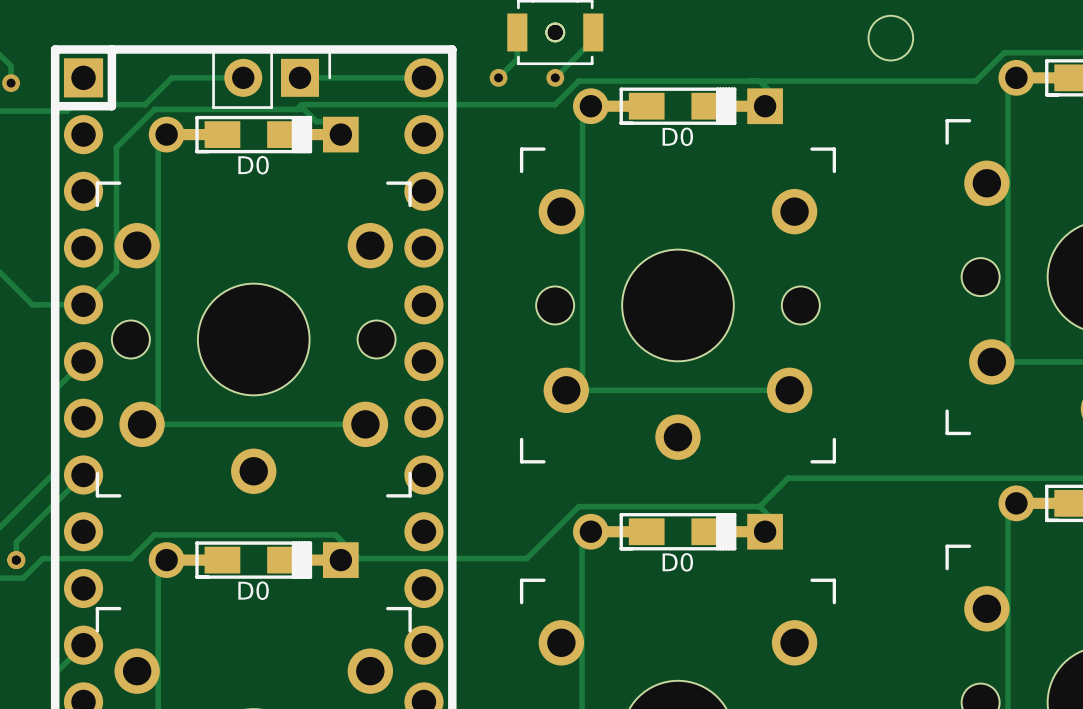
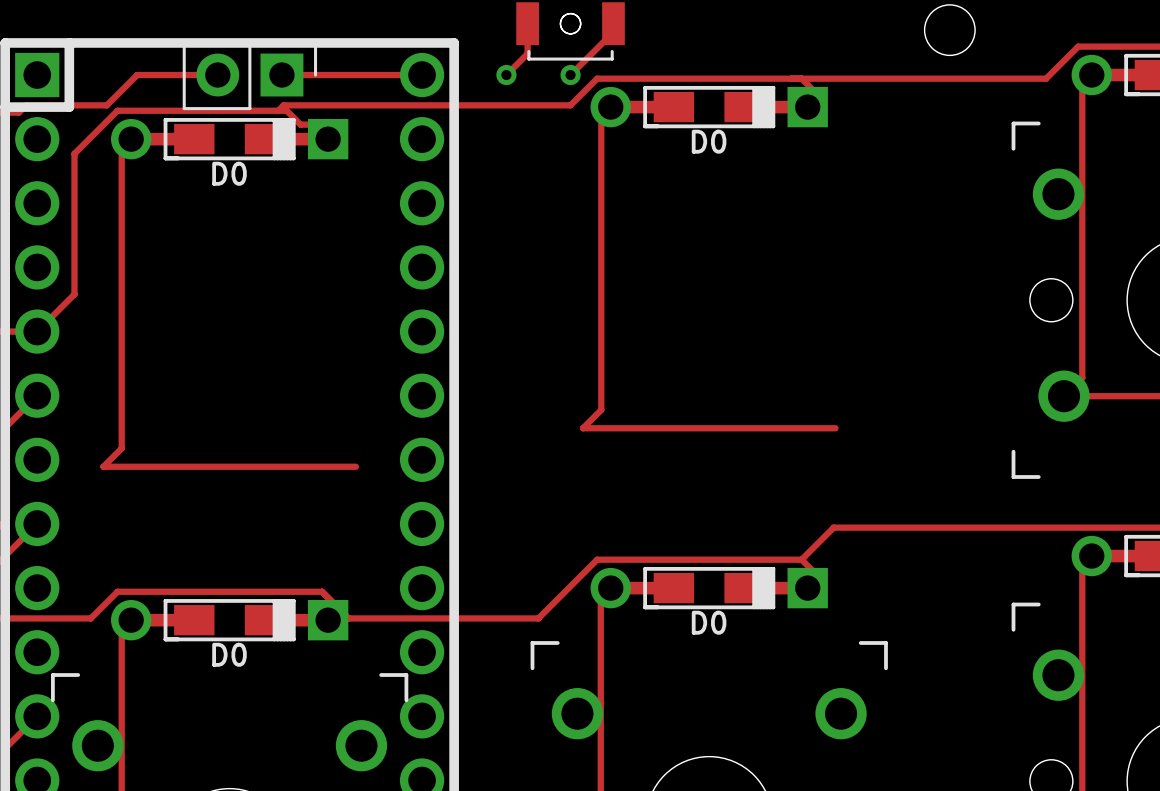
part: (677, 305) -> none
part: (253, 339) -> none

